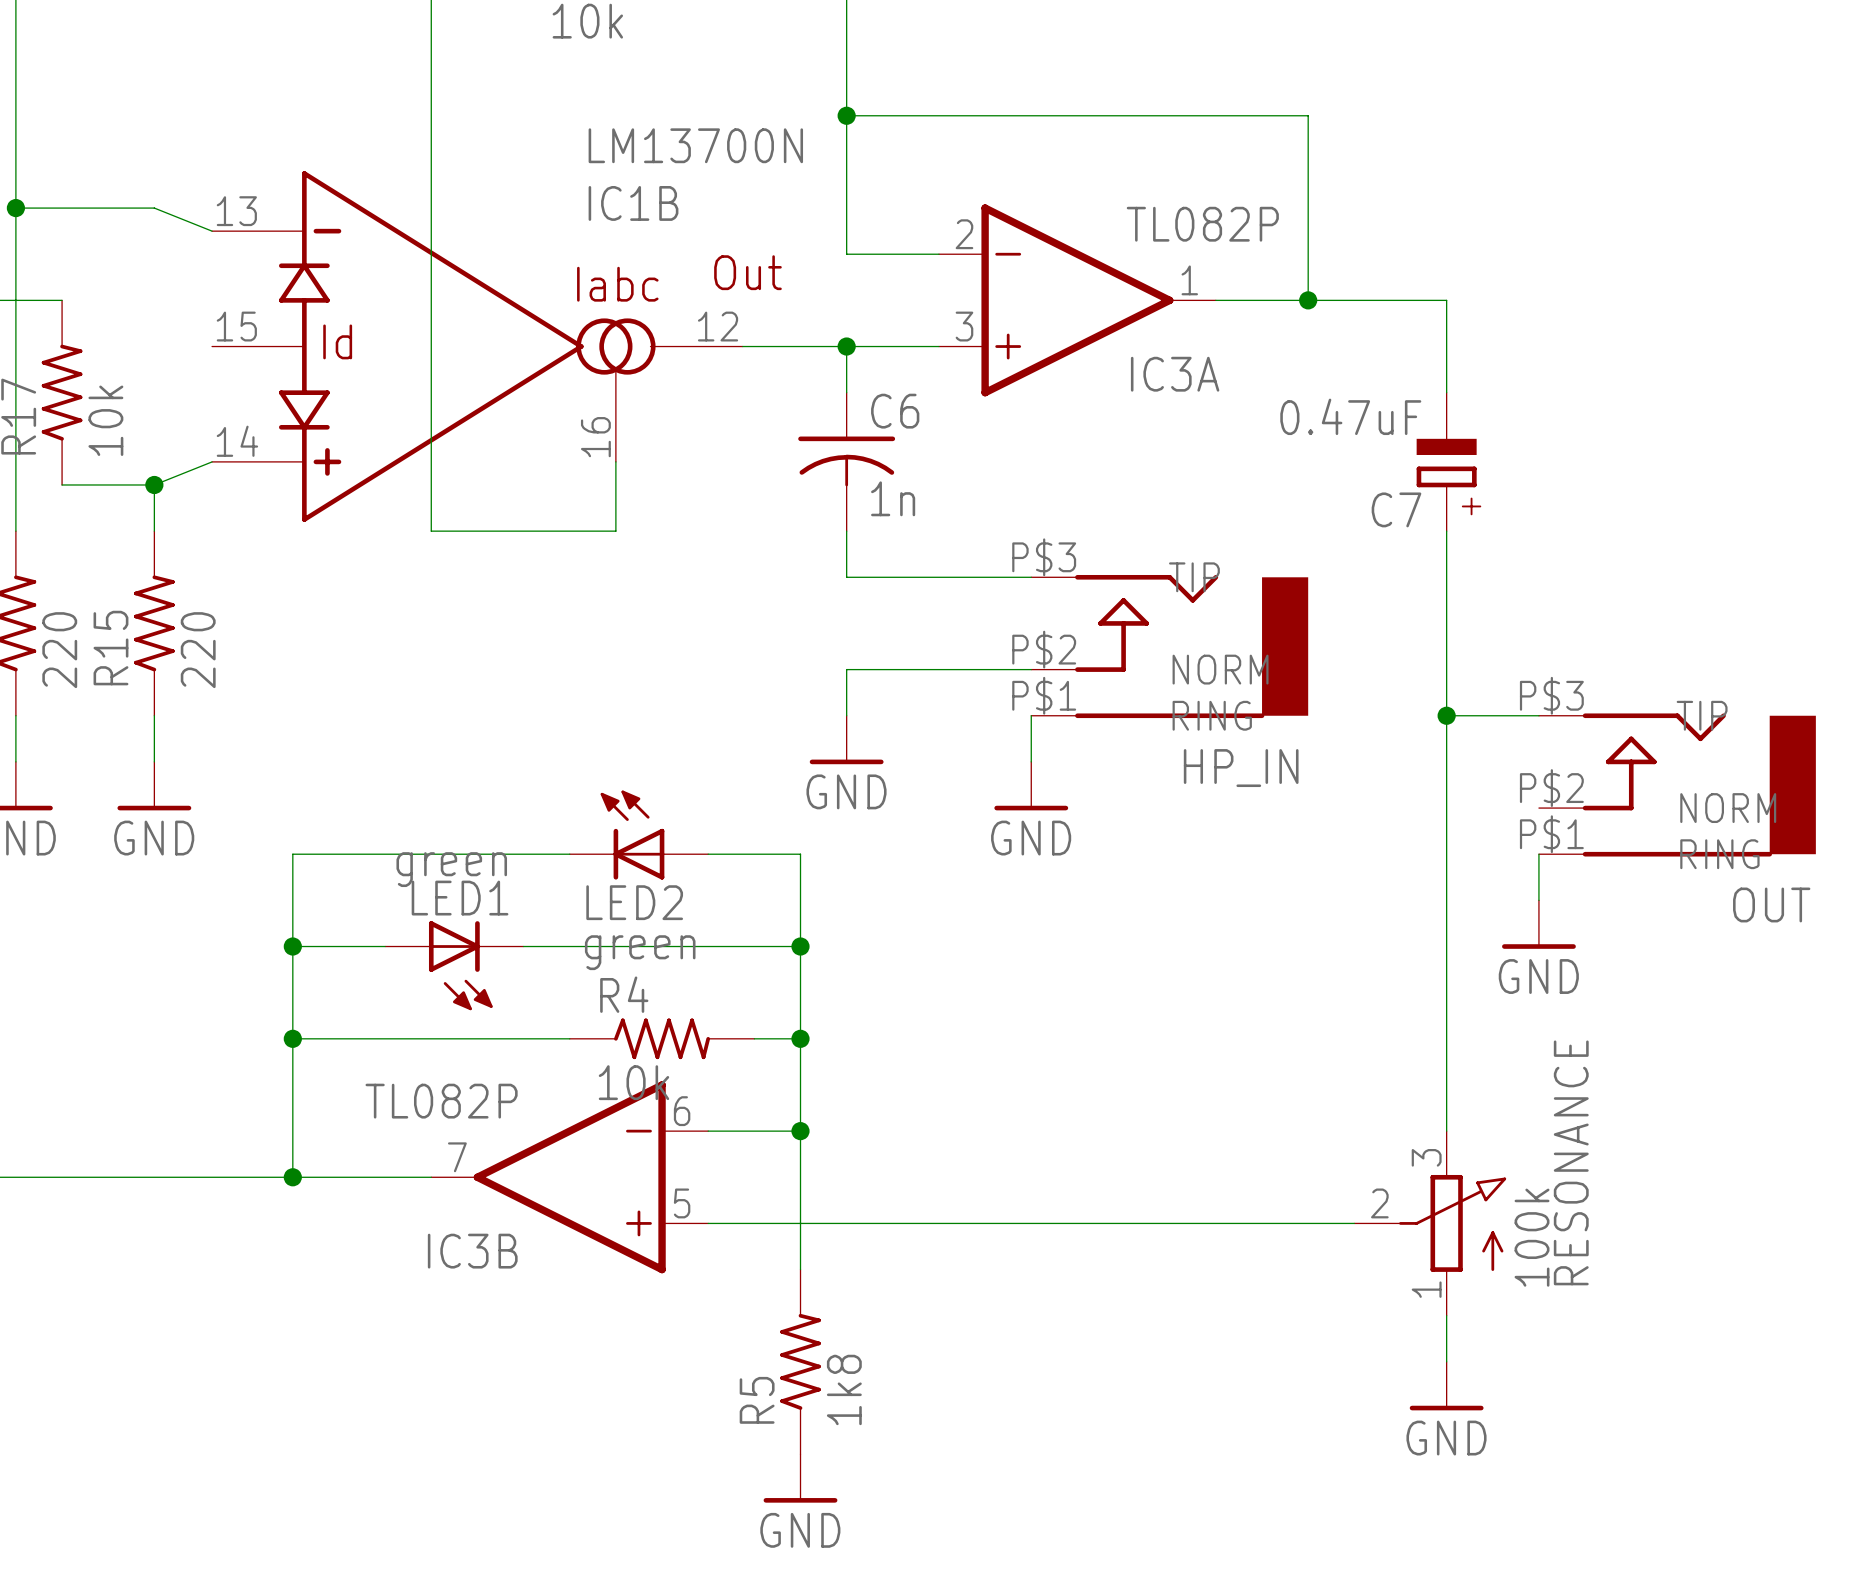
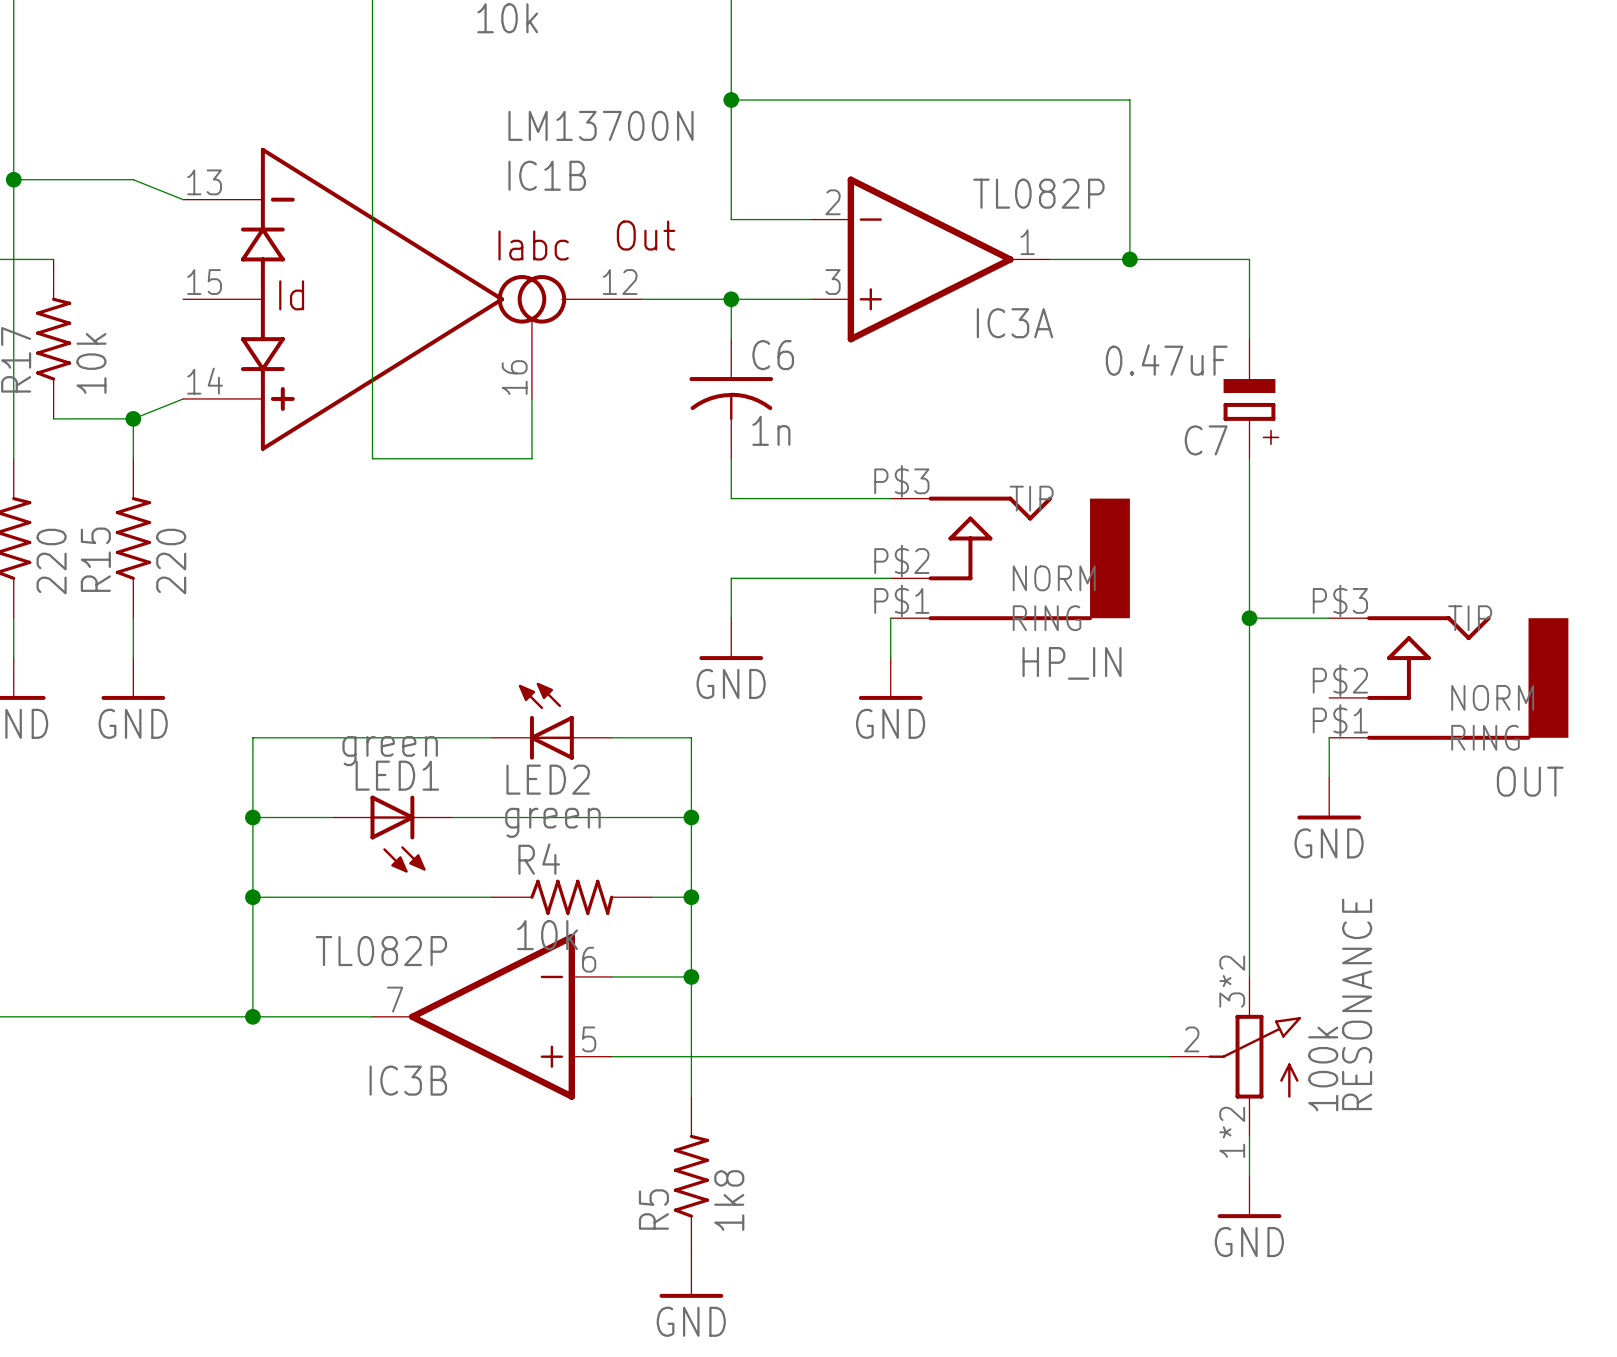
RESONANCE pin number: 3 (1426, 1157) -> 3*2 (1232, 981)
RESONANCE pin number: 1 (1426, 1289) -> 1*2 (1232, 1132)

